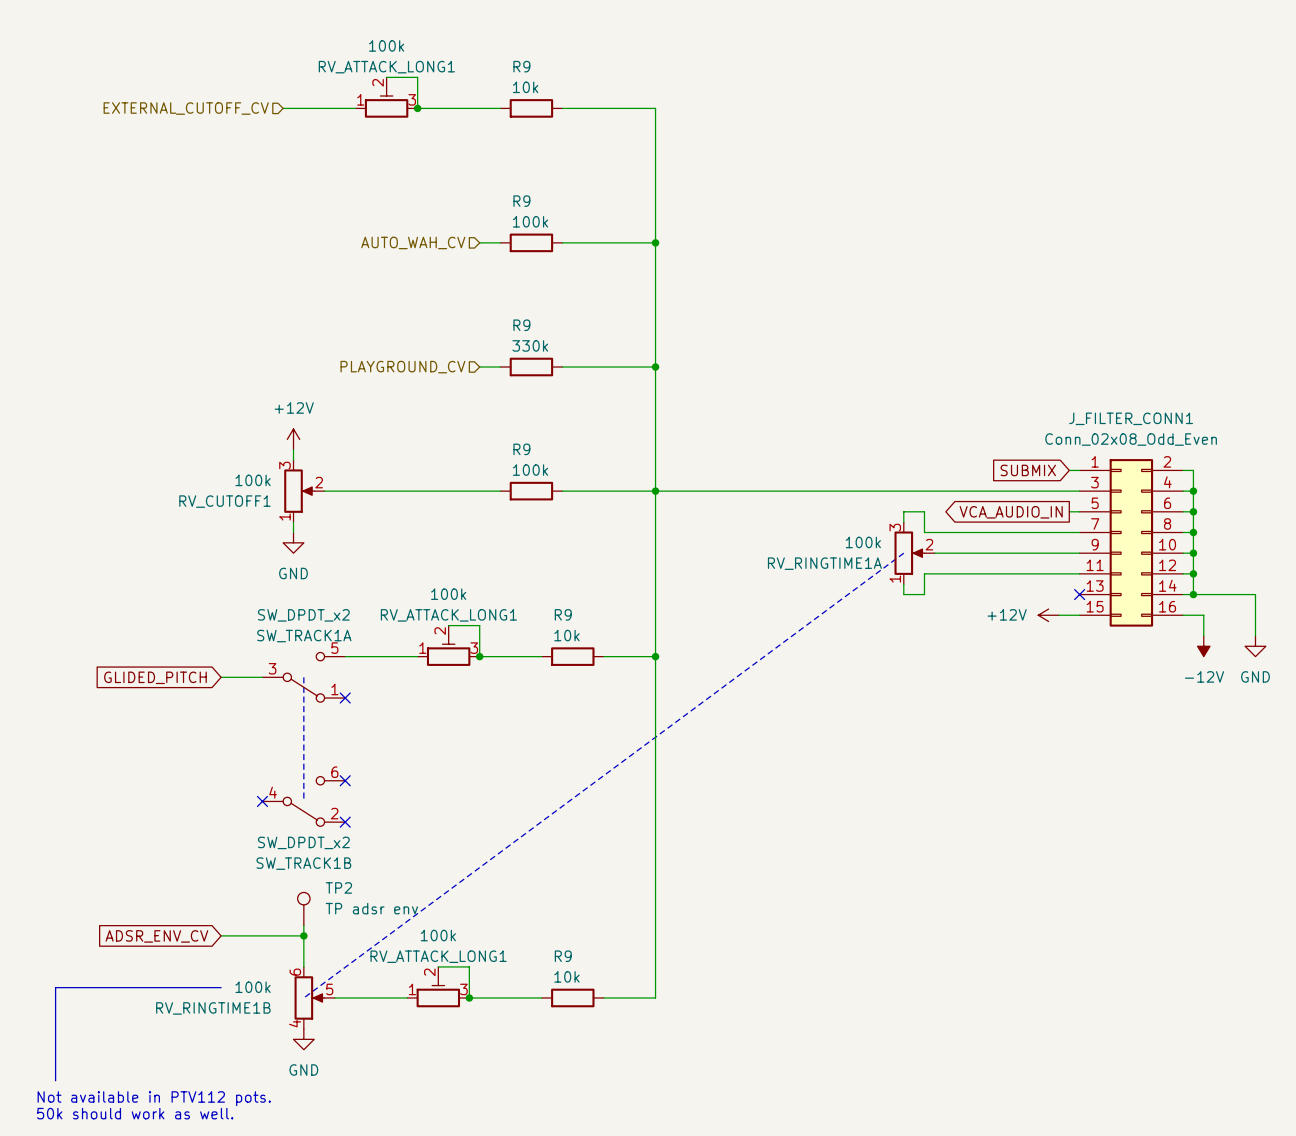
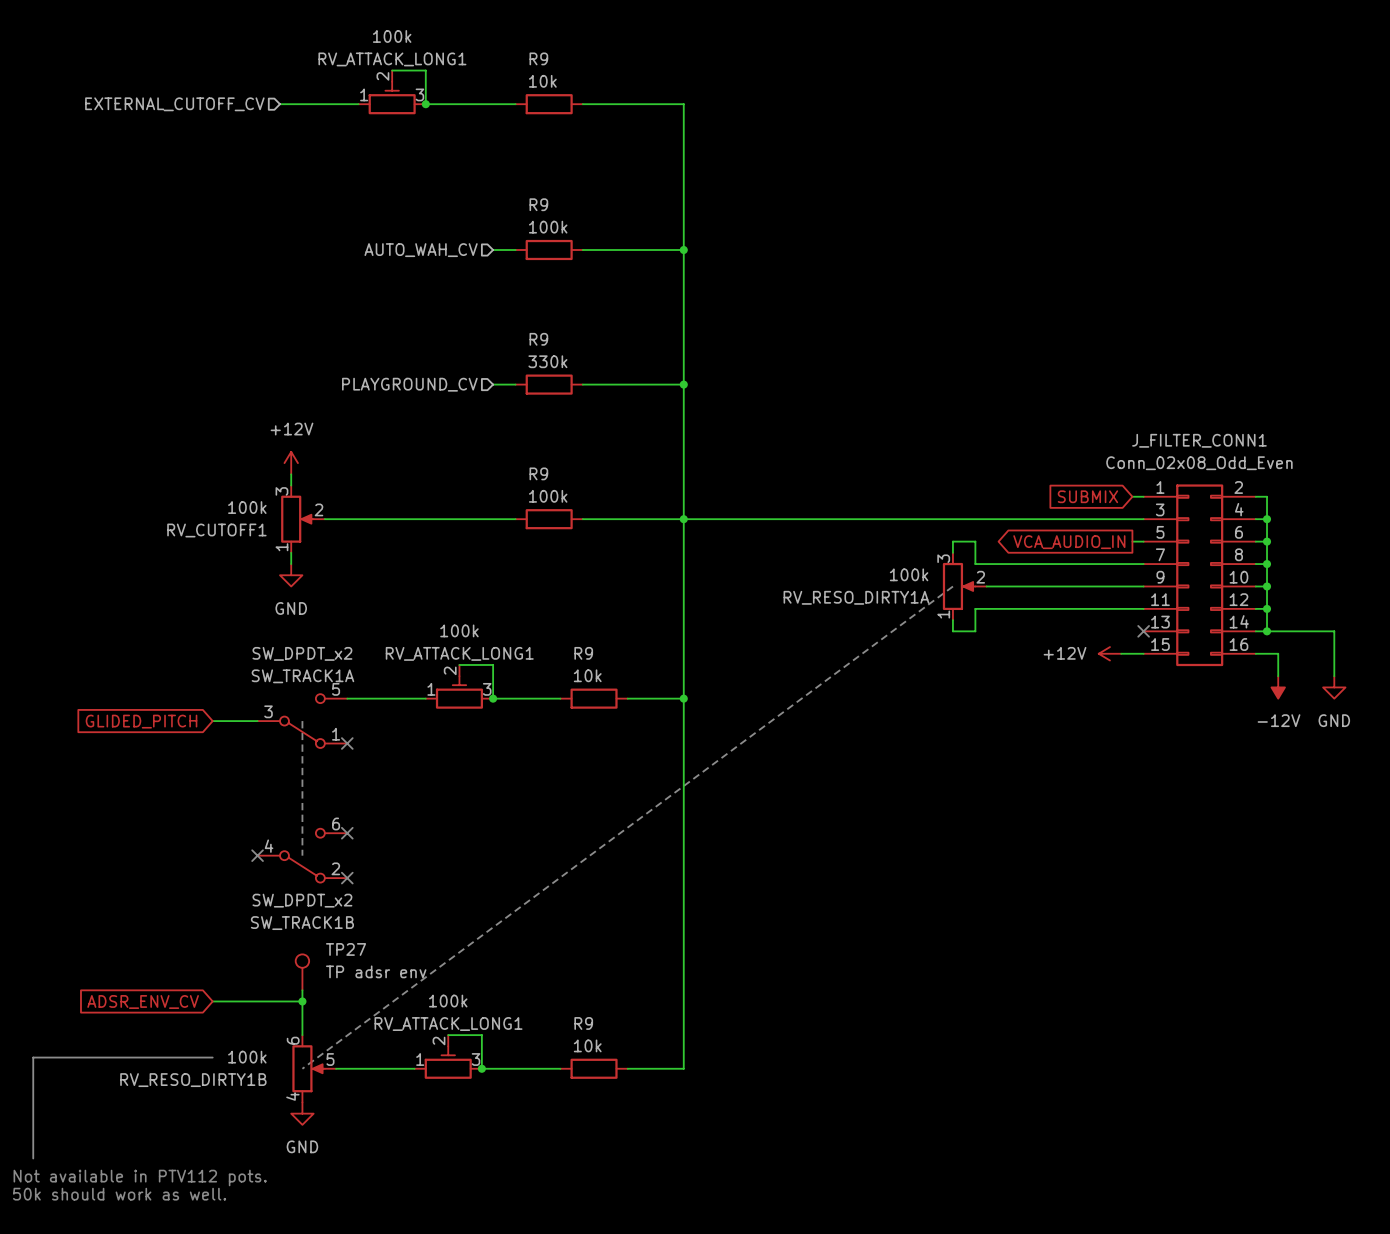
RV_RINGTIME1A name: RV_RINGTIME1A (824, 563) -> RV_RESO_DIRTY1A (856, 597)
TP2 name: TP2 (338, 887) -> TP27 (346, 949)
RV_RINGTIME1B name: RV_RINGTIME1B (213, 1008) -> RV_RESO_DIRTY1B (193, 1080)

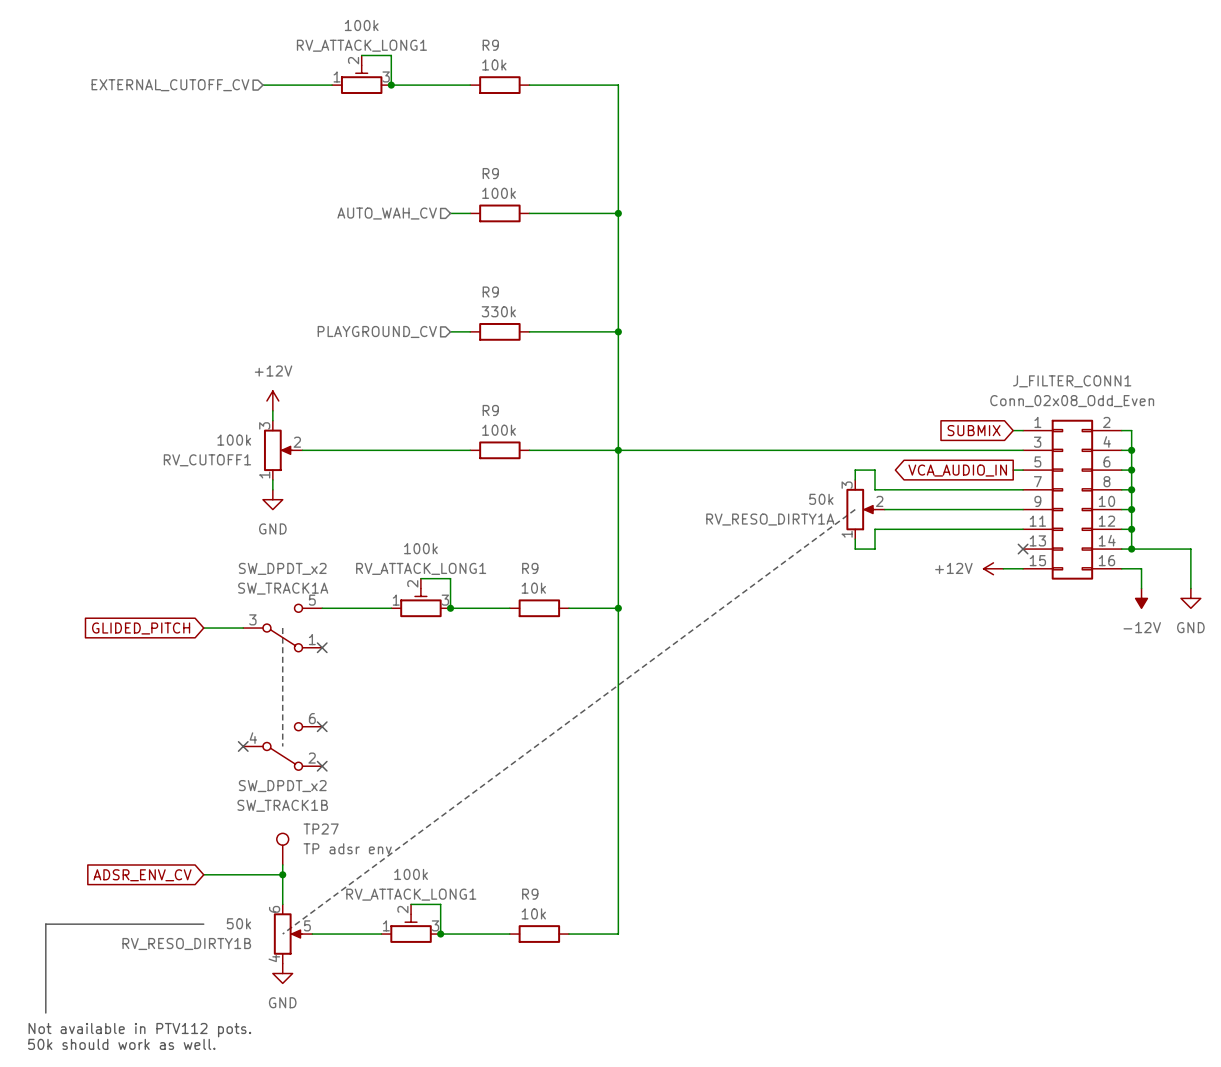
RV_RESO_DIRTY1A value: 100k (909, 574) -> 50k (821, 499)
RV_RESO_DIRTY1B value: 100k (247, 1057) -> 50k (238, 923)

